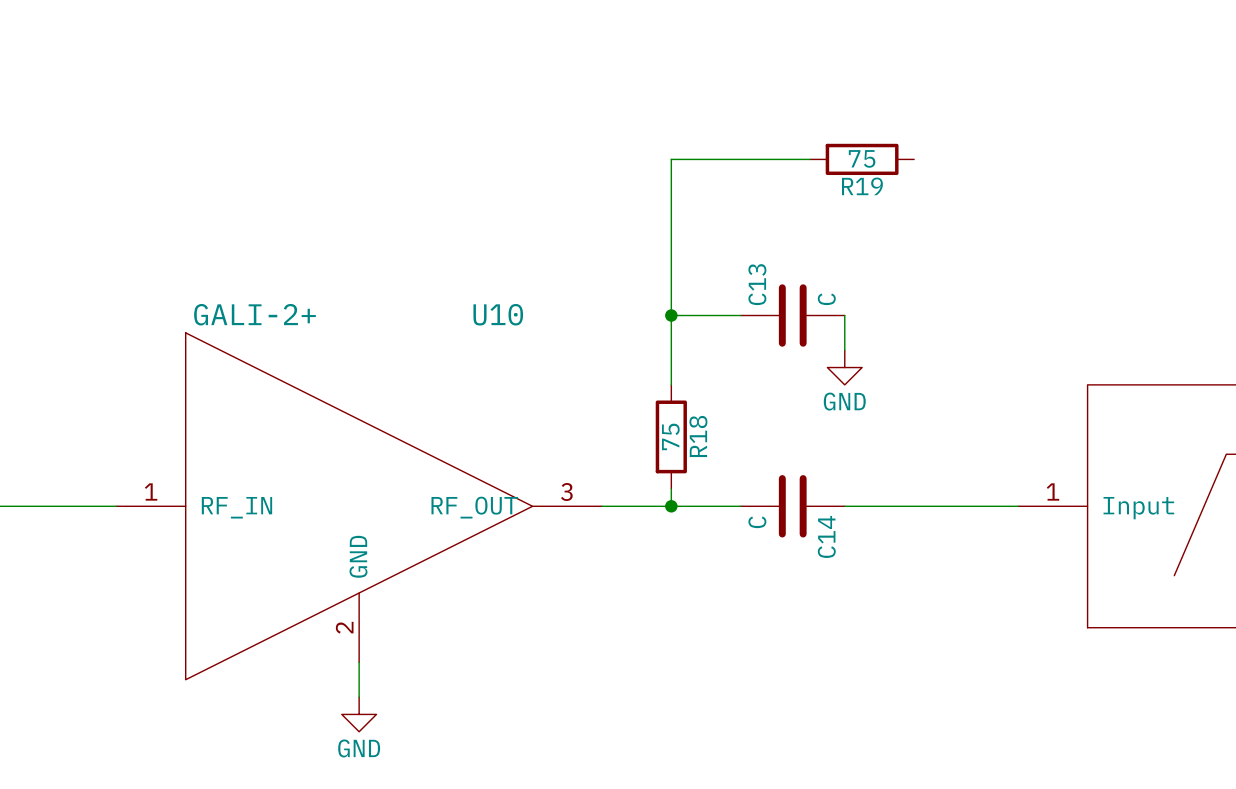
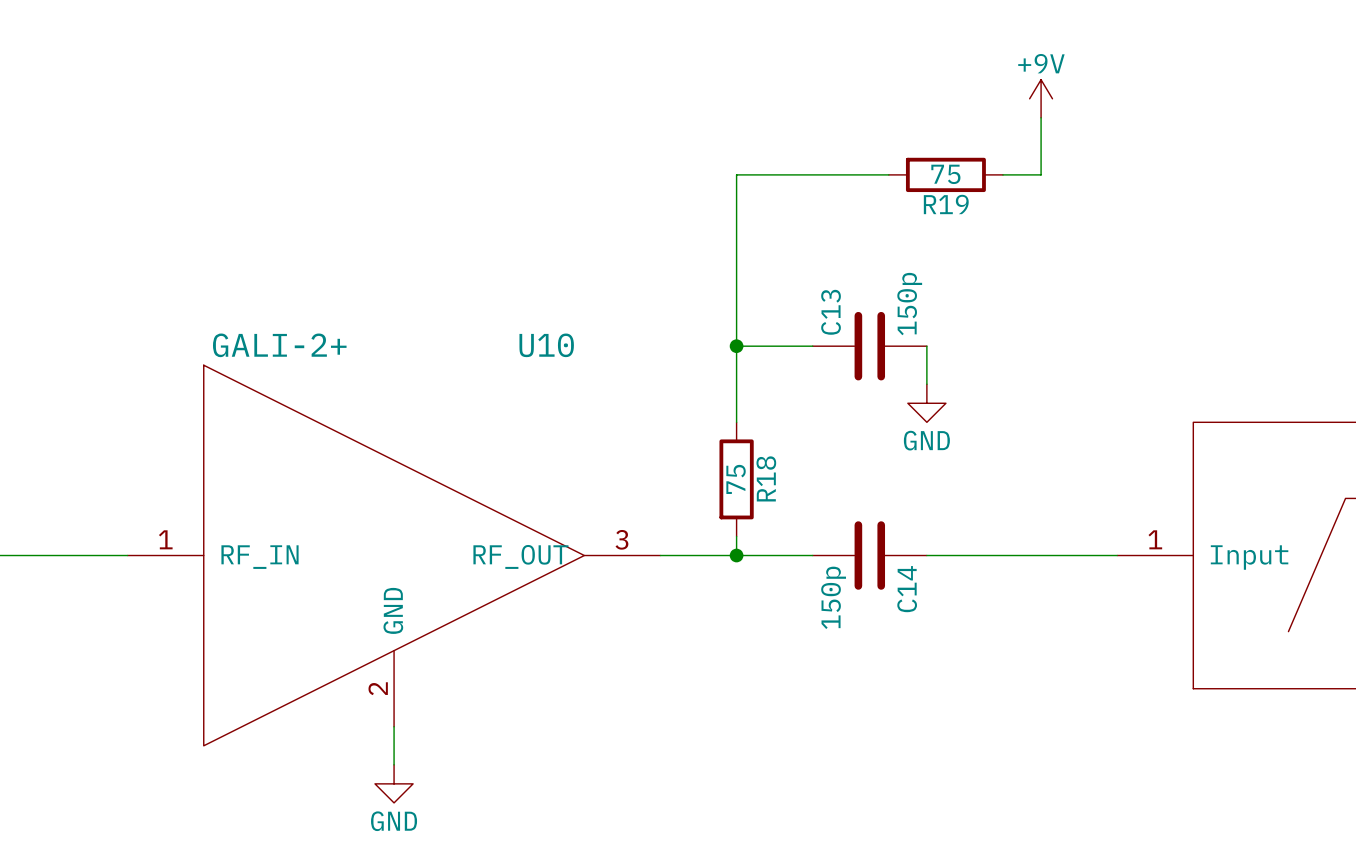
power symbol: none -> +9V (1041, 98)
wire: none -> (1041, 117) (1041, 174) (1003, 174)
C13 value: C (826, 299) -> 150p (909, 304)
C14 value: C (757, 522) -> 150p (833, 597)

